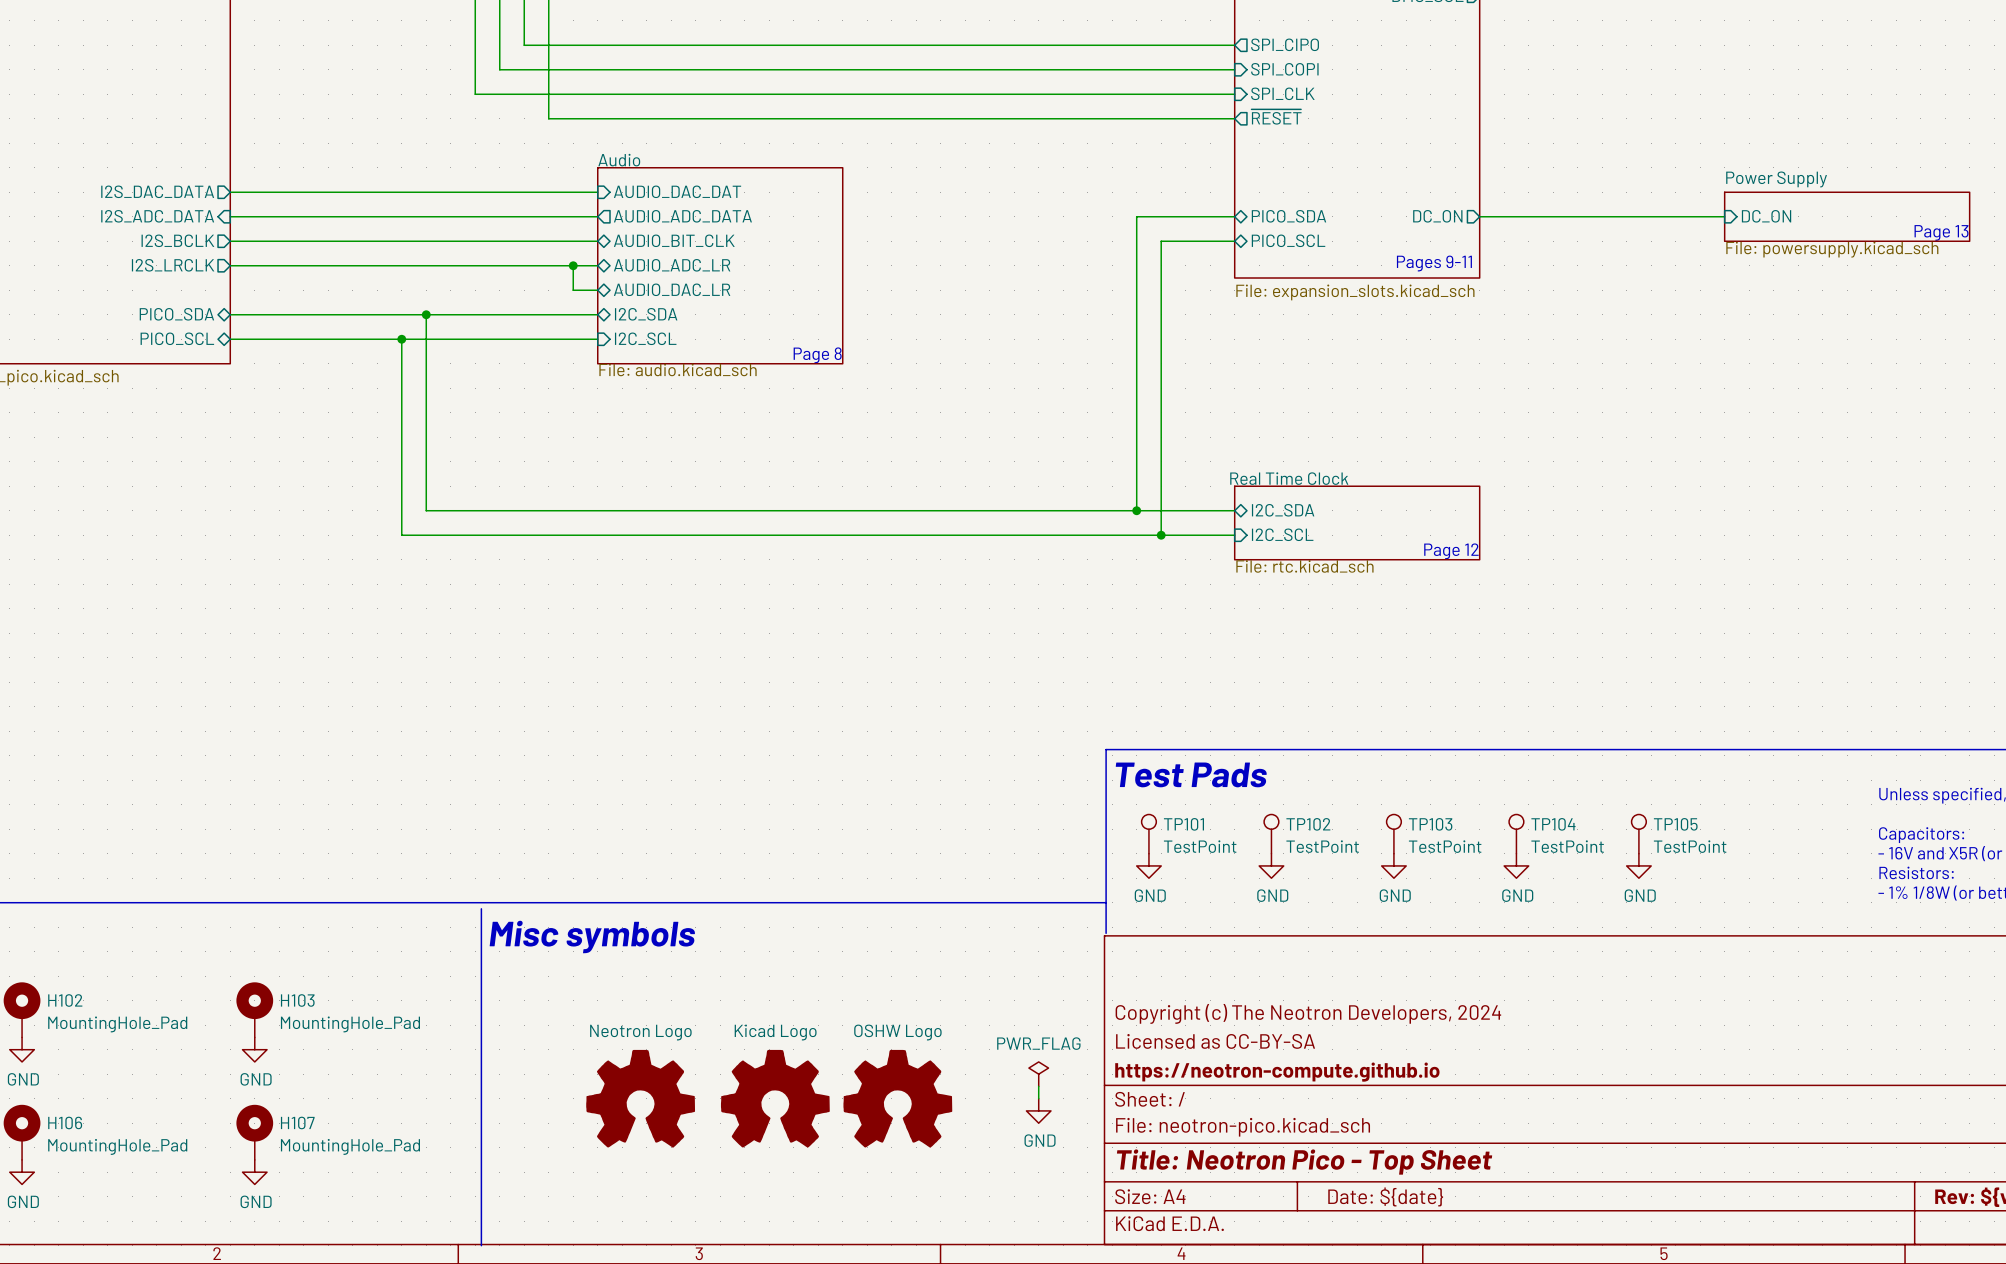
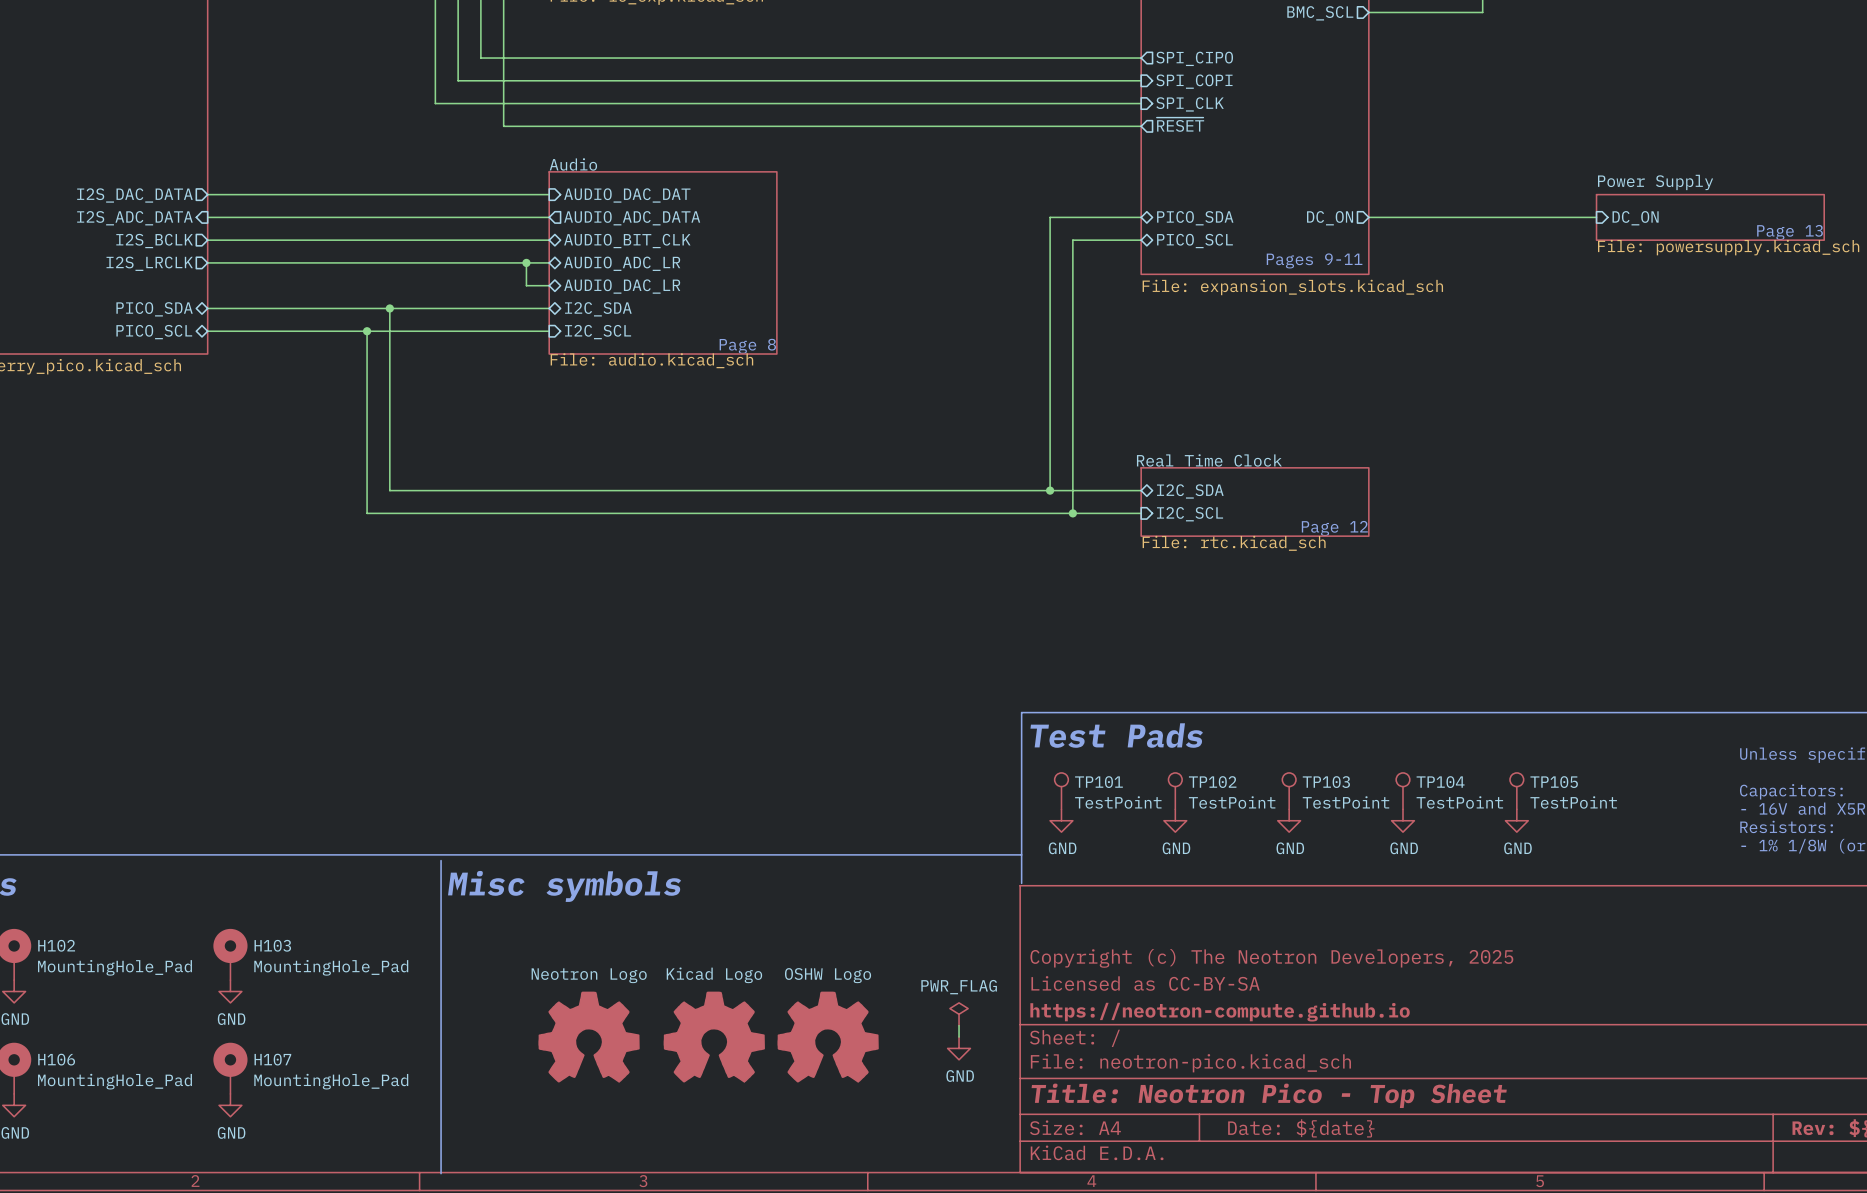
title block: Copyright (c) The Neotron Developers, 2024 (1308, 1013) -> Copyright (c) The Neotron Developers, 2025 (1271, 958)

